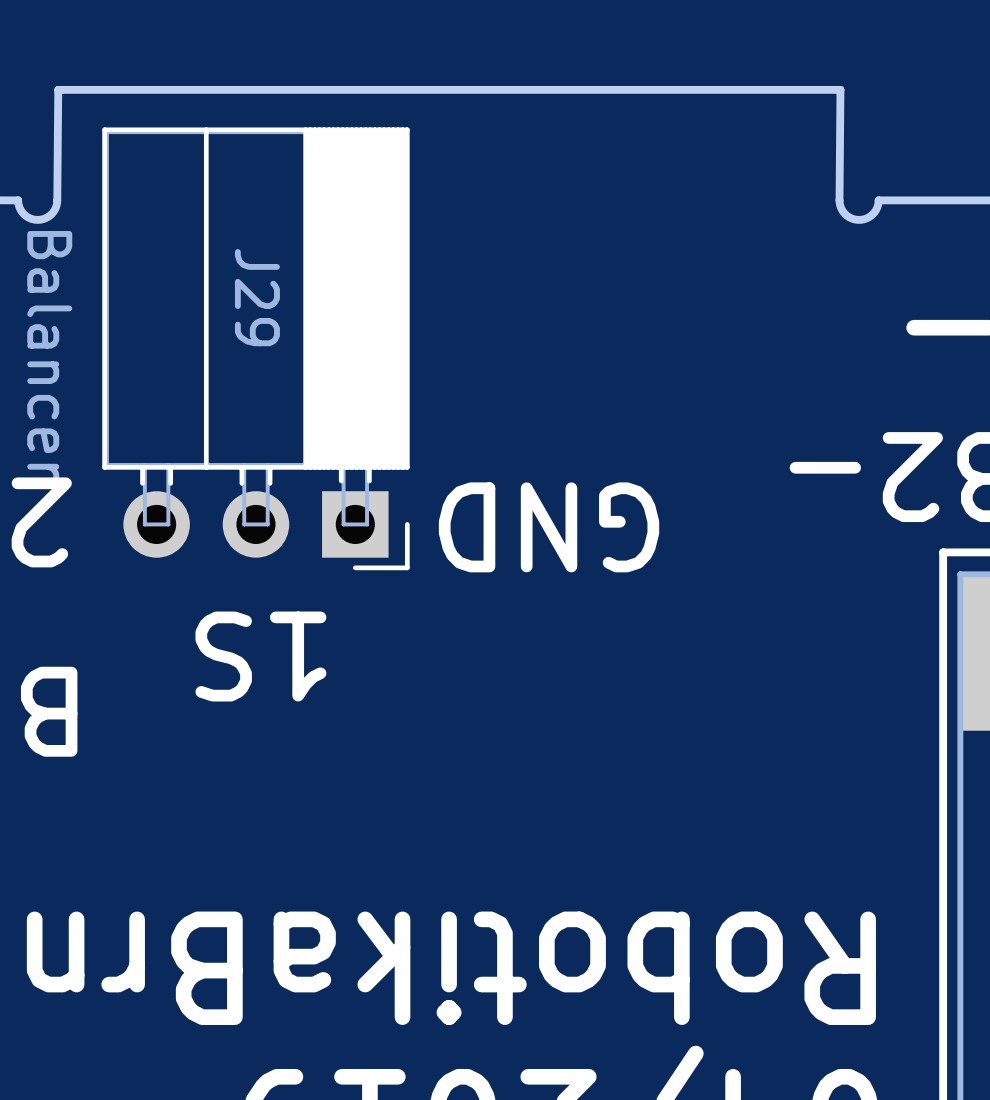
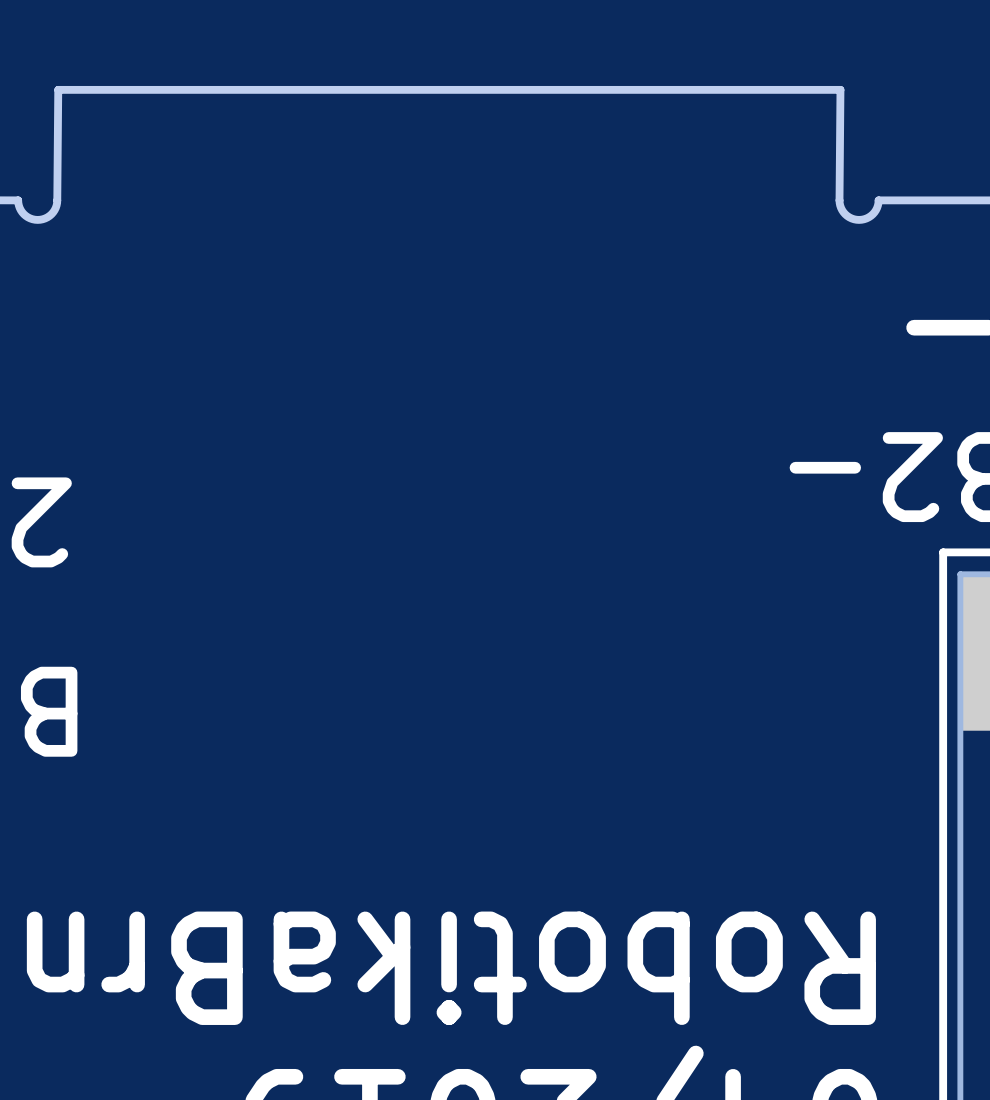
J29: Balancer (255, 348) -> none
text: GND (549, 527) -> none
text: 1S (260, 656) -> none

